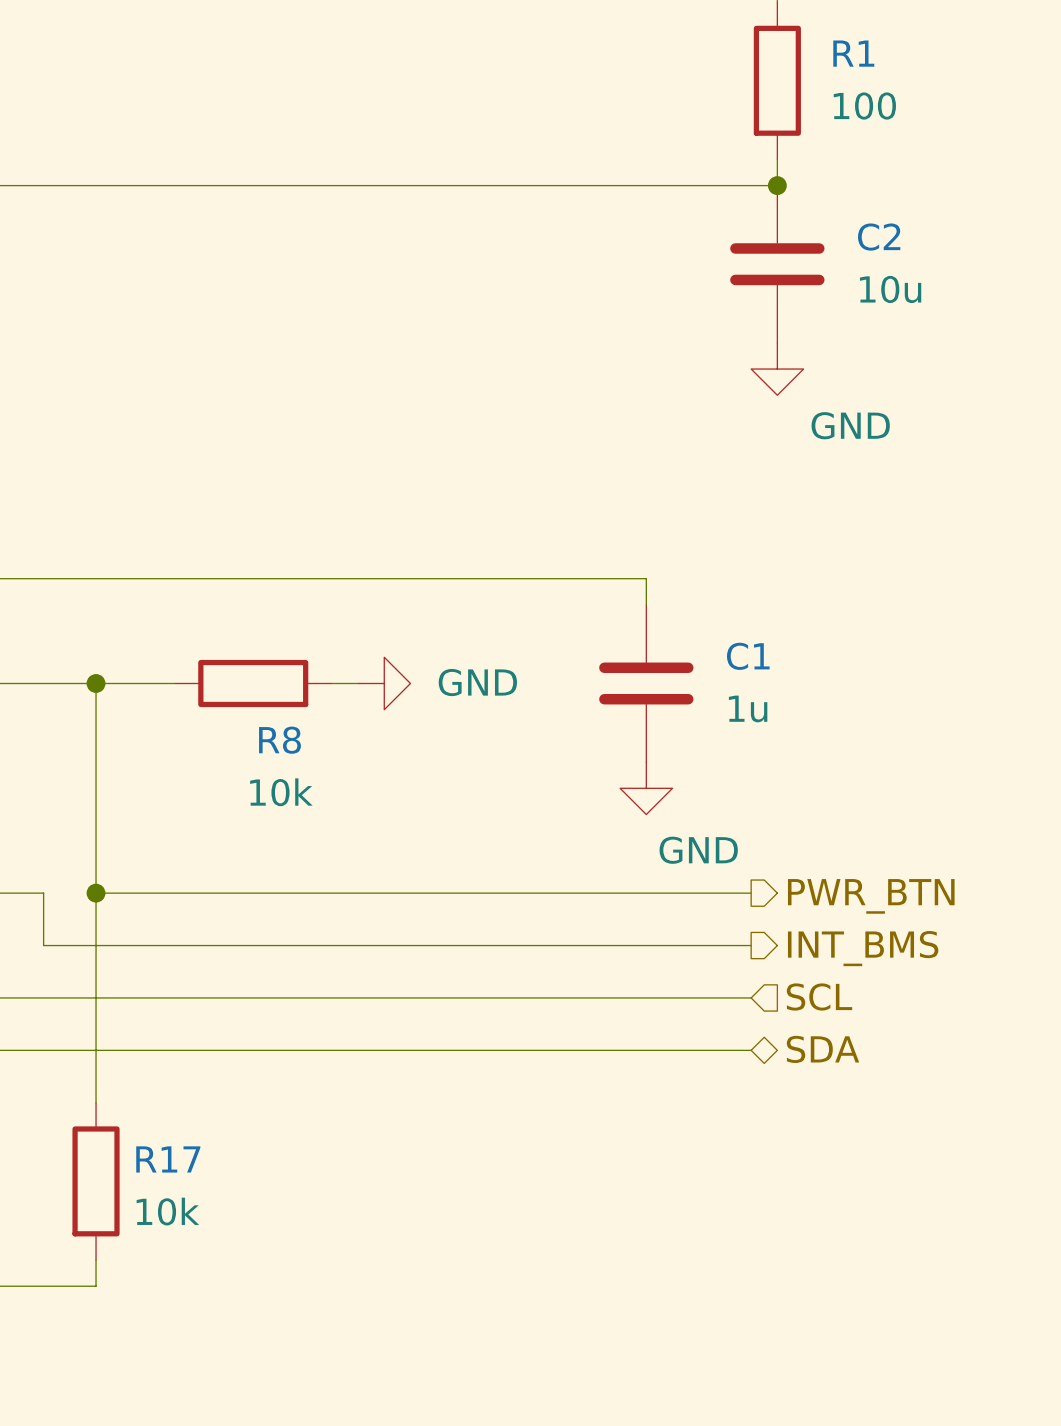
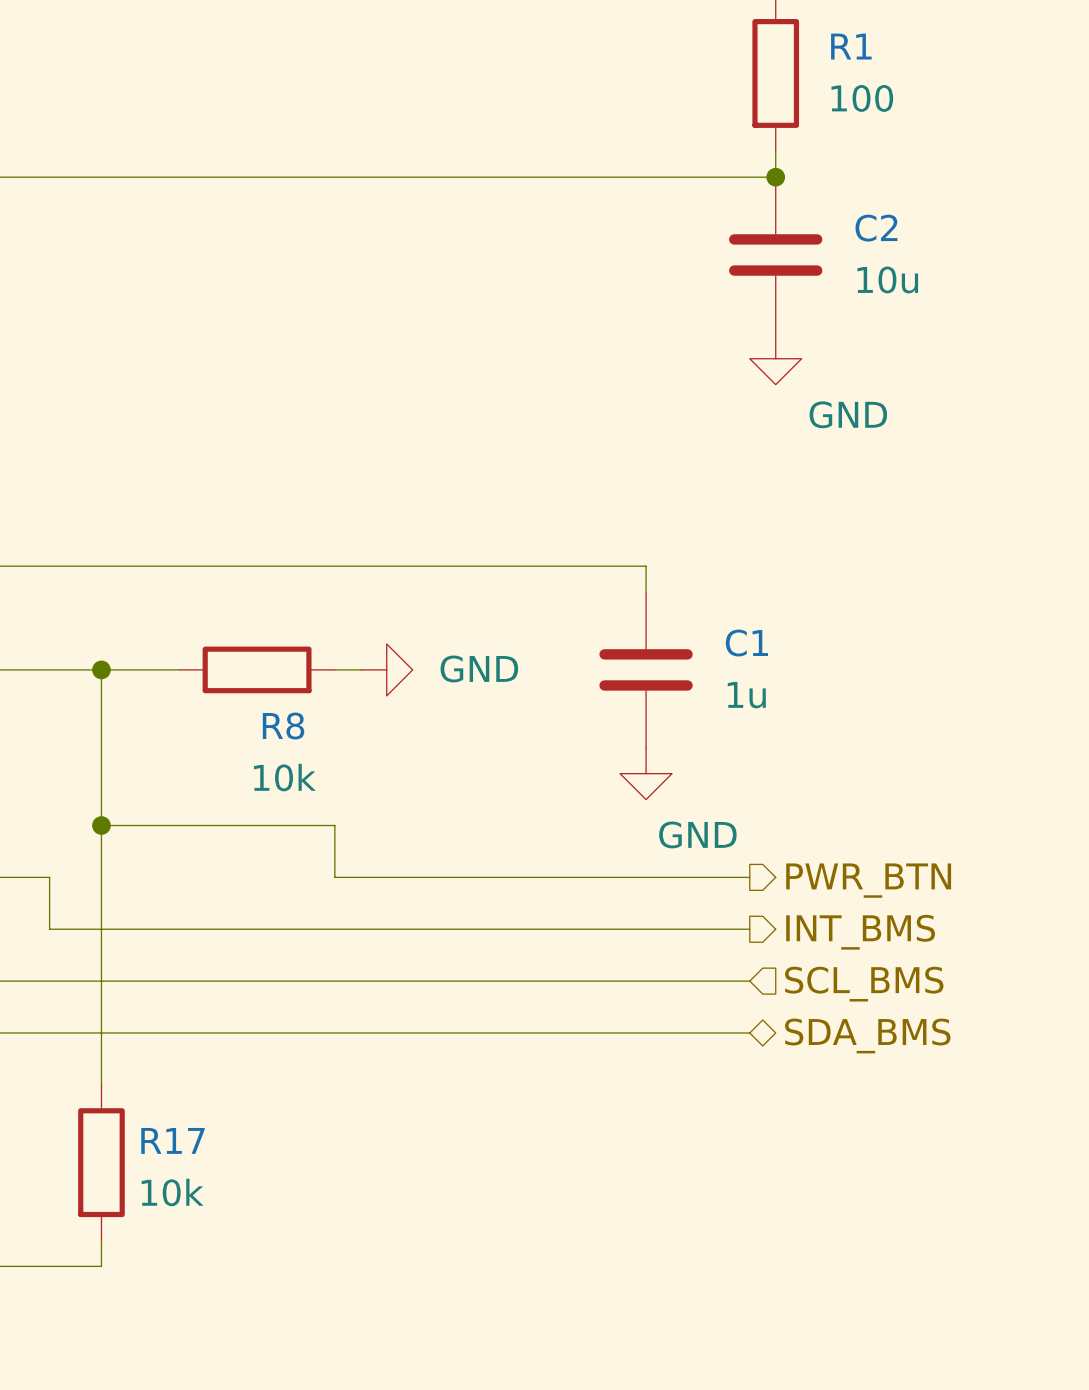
wire: (96, 893) (331, 893) -> (101, 825) (334, 825) (334, 877)
junction position: (96, 893) -> (101, 825)
hierarchical label: SCL (819, 997) -> SCL_BMS (864, 984)
hierarchical label: SDA (823, 1049) -> SDA_BMS (867, 1035)

